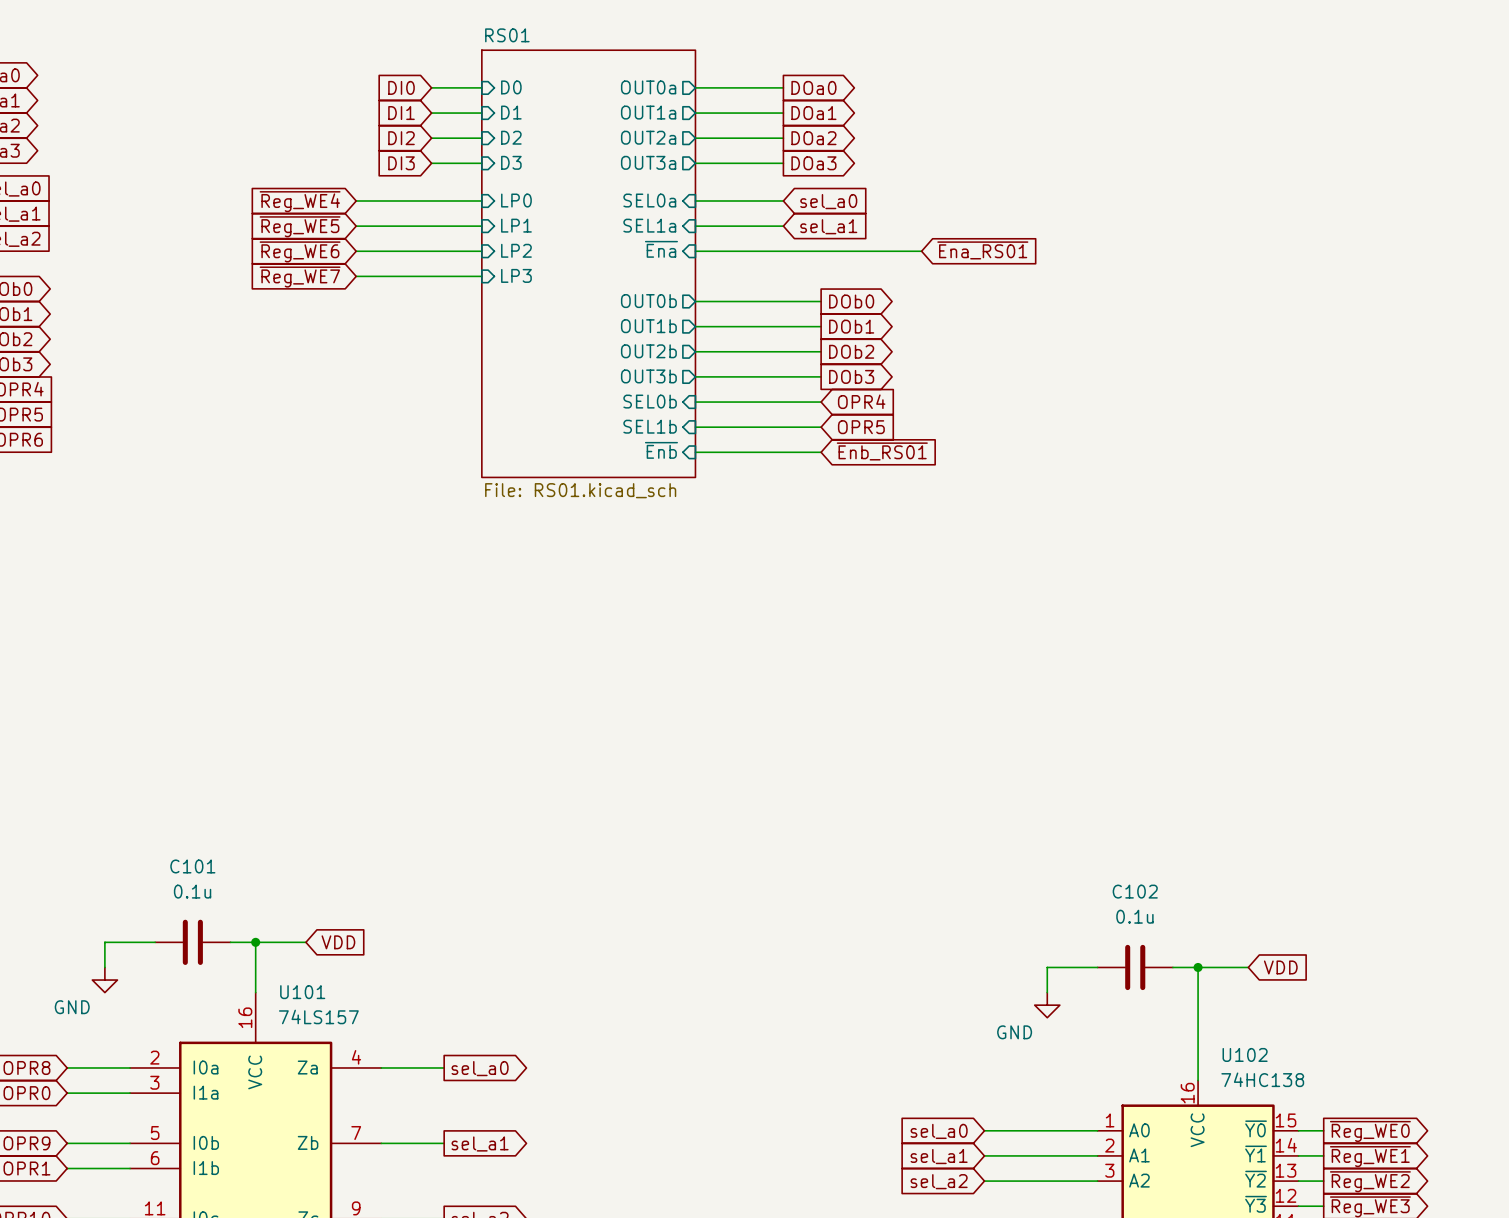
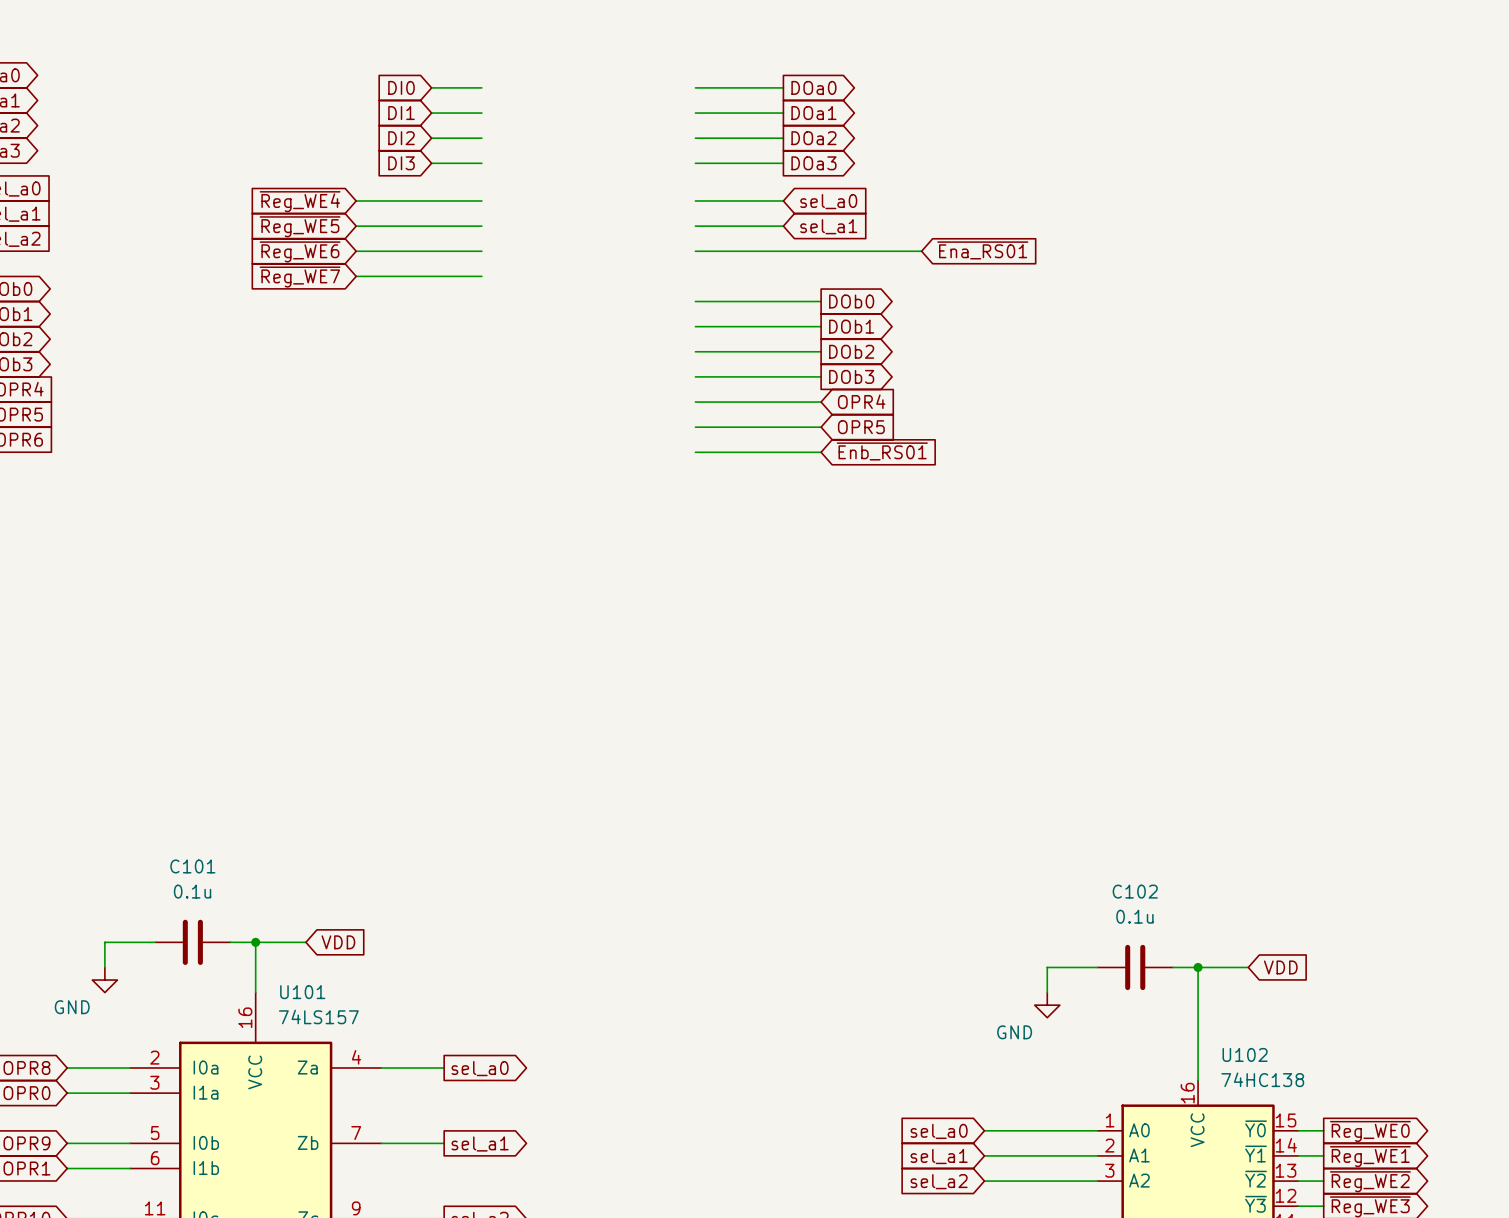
sheet pin: D0 (511, 87) -> none
sheet pin: OUT0a (648, 87) -> none
sheet pin: D1 (511, 112) -> none
sheet pin: OUT1a (648, 112) -> none
sheet pin: D2 (511, 137) -> none
sheet pin: OUT2a (648, 137) -> none
sheet pin: D3 (511, 162) -> none
sheet pin: OUT3a (648, 162) -> none
sheet pin: LP0 (516, 200) -> none
sheet pin: SEL0a (649, 200) -> none
sheet pin: LP1 (516, 225) -> none
sheet pin: SEL1a (649, 225) -> none
sheet pin: ~{Ena} (661, 249) -> none
sheet pin: LP2 (516, 250) -> none
sheet RS01: File: RS01.kicad_sch (588, 263) -> none
sheet pin: LP3 (516, 275) -> none
sheet pin: OUT0b (648, 301) -> none
sheet pin: OUT1b (648, 326) -> none
sheet pin: OUT2b (648, 351) -> none
sheet pin: OUT3b (648, 376) -> none
sheet pin: SEL0b (650, 401) -> none
sheet pin: SEL1b (650, 426) -> none
sheet pin: ~{Enb} (661, 450) -> none

